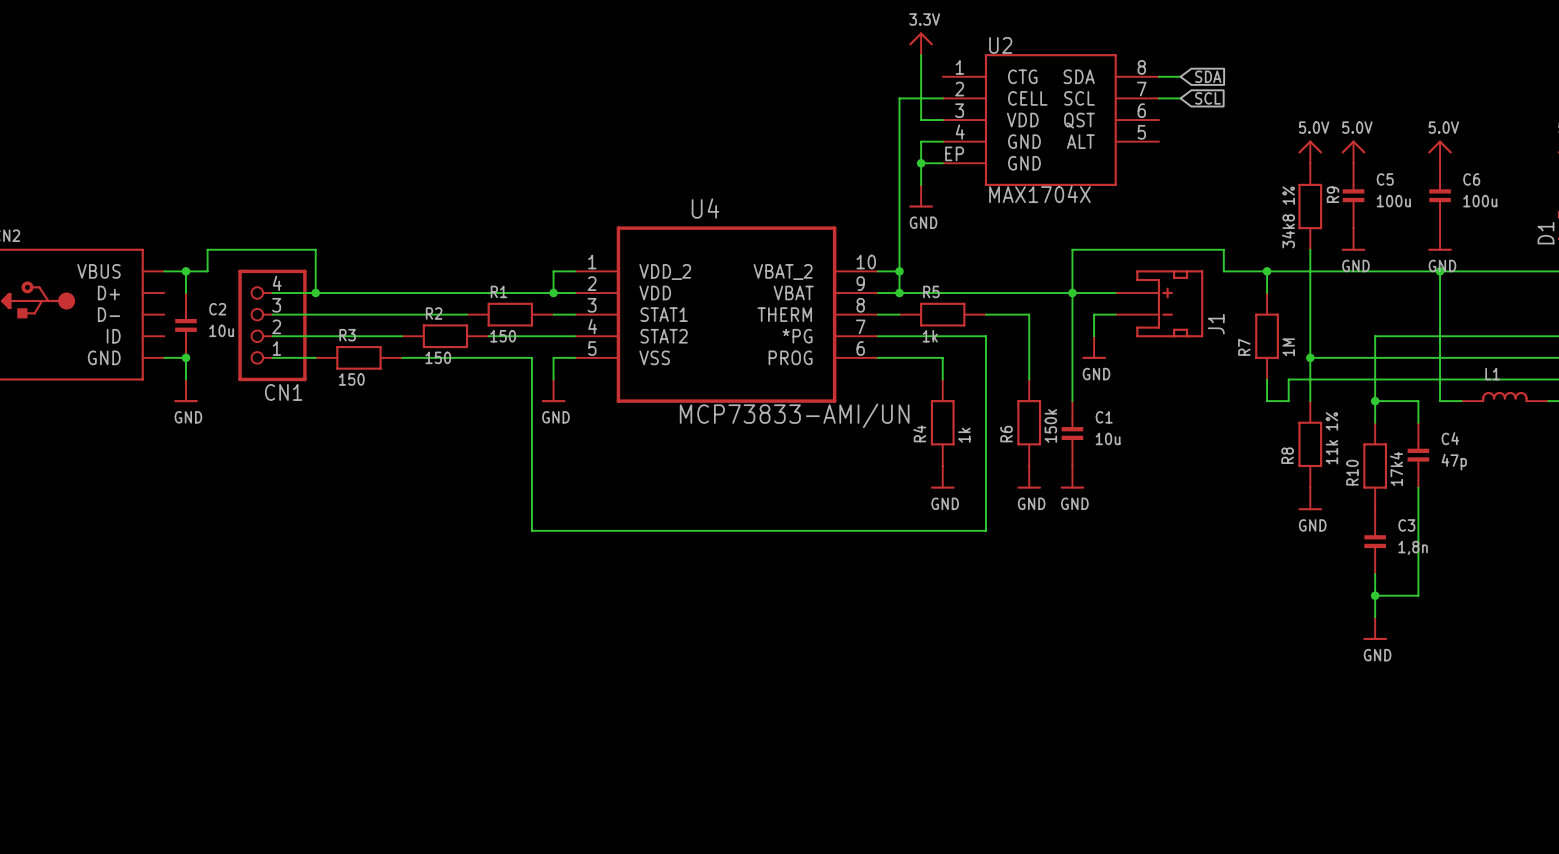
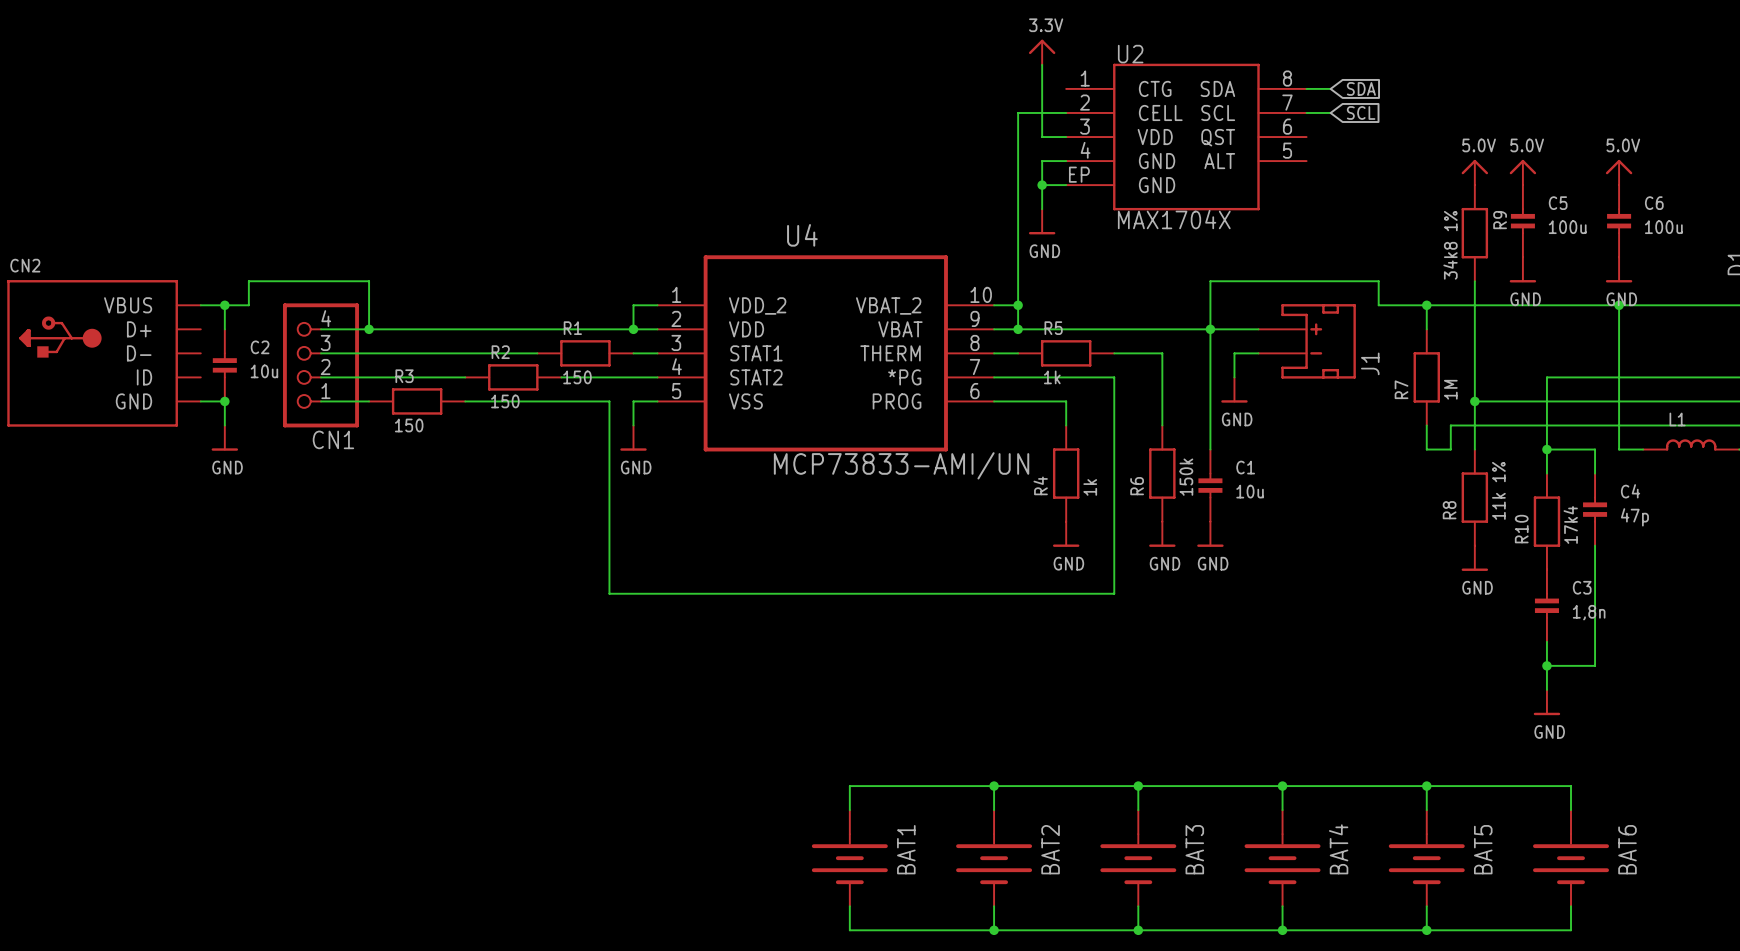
wire: none -> (994, 786) (994, 810)
junction: none -> (994, 786)
wire: none -> (1138, 786) (1138, 810)
junction: none -> (1138, 786)
wire: none -> (1282, 786) (1282, 810)
junction: none -> (1282, 786)
wire: none -> (1426, 786) (1426, 810)
junction: none -> (1426, 786)
wire: none -> (849, 810) (849, 786) (1571, 786) (1571, 810)
BAT1: none -> (849, 858)
BAT2: none -> (994, 858)
BAT3: none -> (1138, 858)
BAT4: none -> (1282, 858)
BAT5: none -> (1426, 858)
BAT6: none -> (1571, 858)
wire: none -> (849, 906) (849, 930) (1571, 930) (1571, 906)
wire: none -> (994, 906) (994, 930)
wire: none -> (1138, 906) (1138, 930)
wire: none -> (1282, 906) (1282, 930)
wire: none -> (1426, 906) (1426, 930)
junction: none -> (994, 930)
junction: none -> (1138, 930)
junction: none -> (1282, 930)
junction: none -> (1426, 930)

